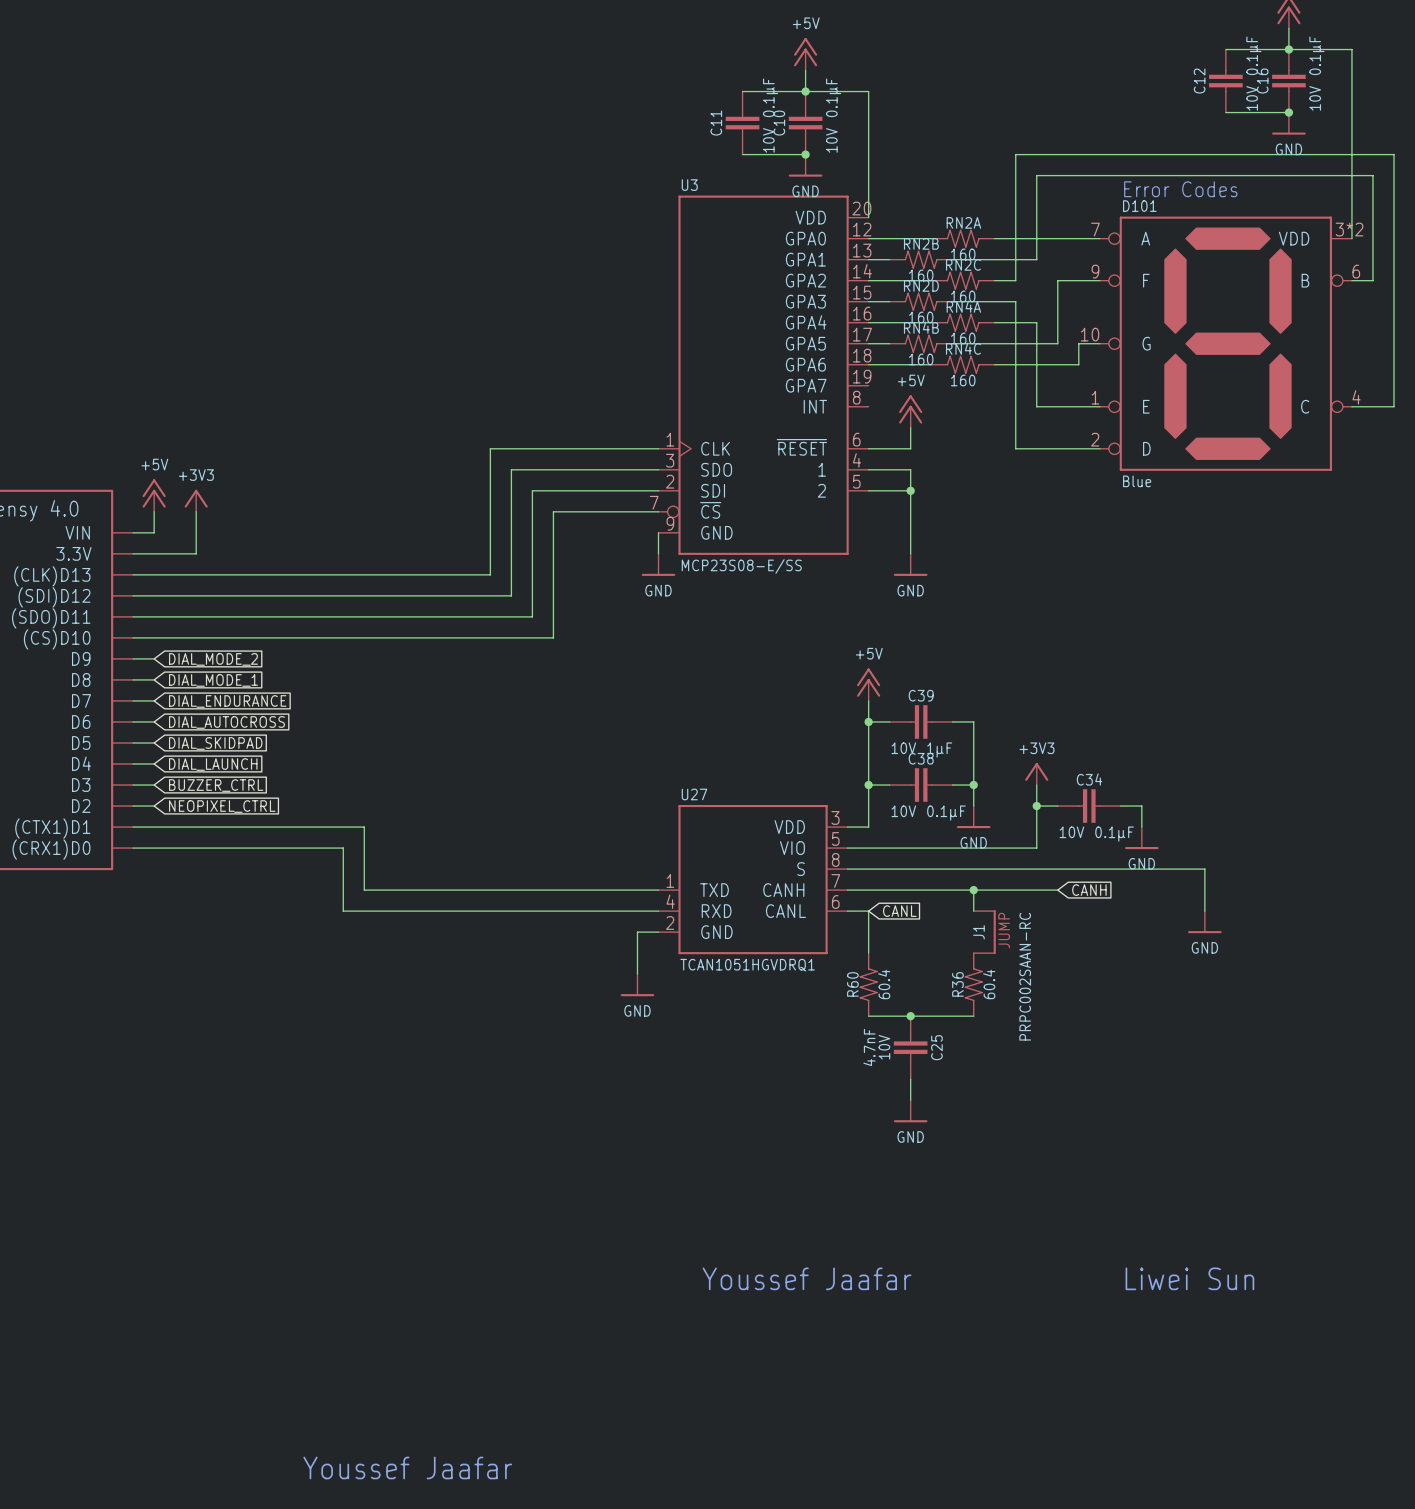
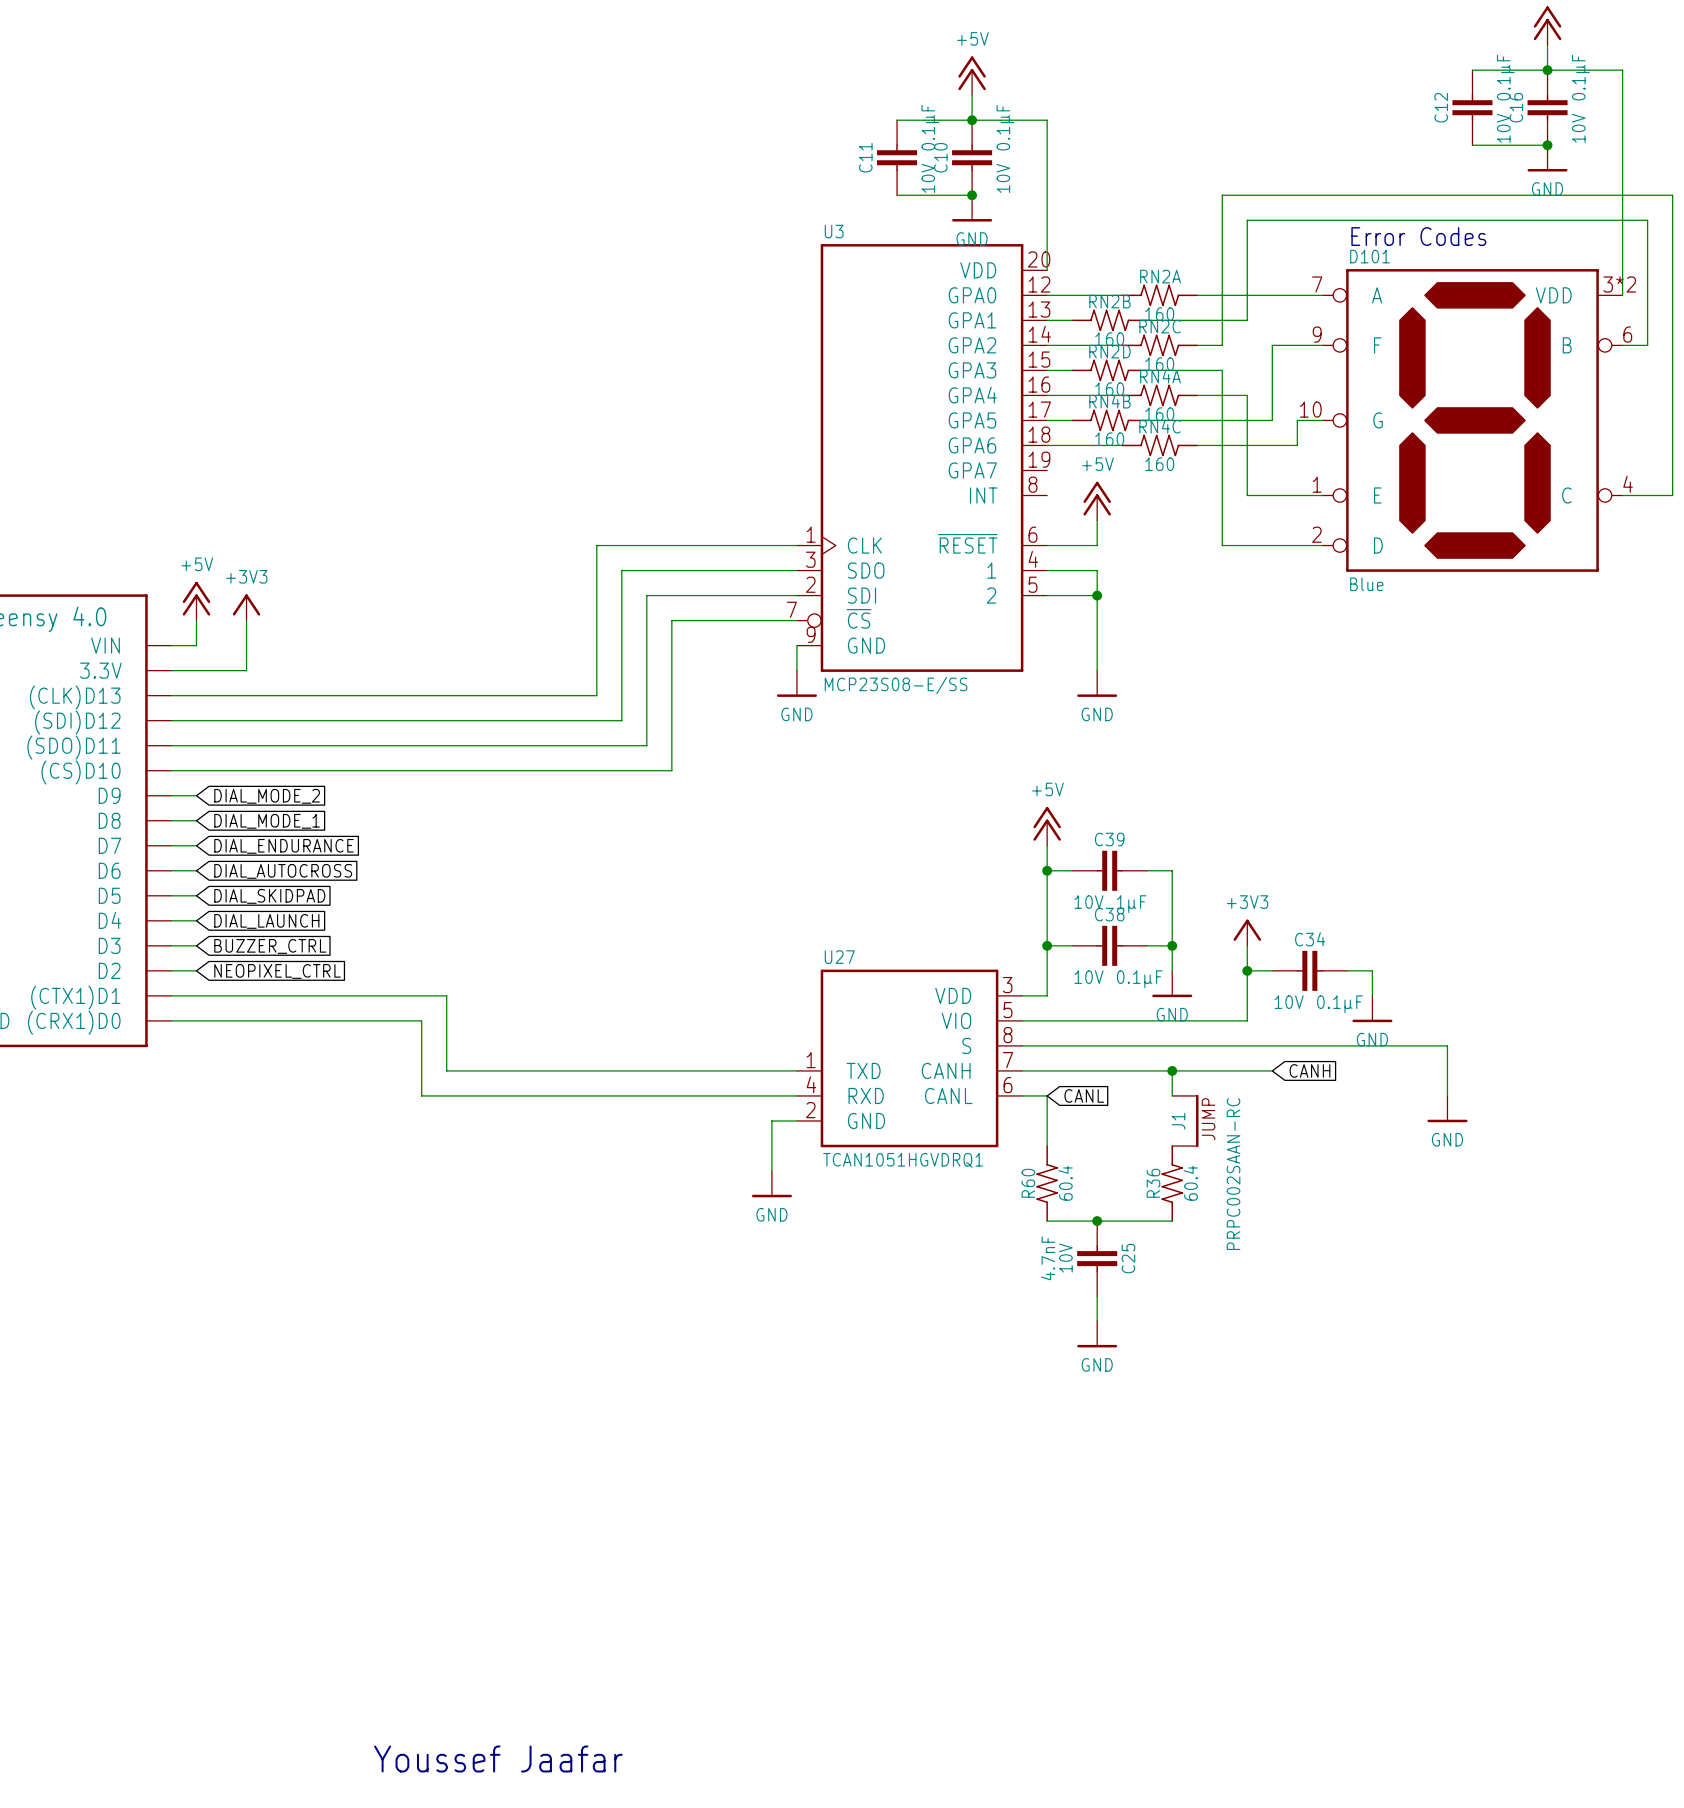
text: Youssef Jaafar (807, 1278) -> none
text: Liwei Sun (1189, 1278) -> none

